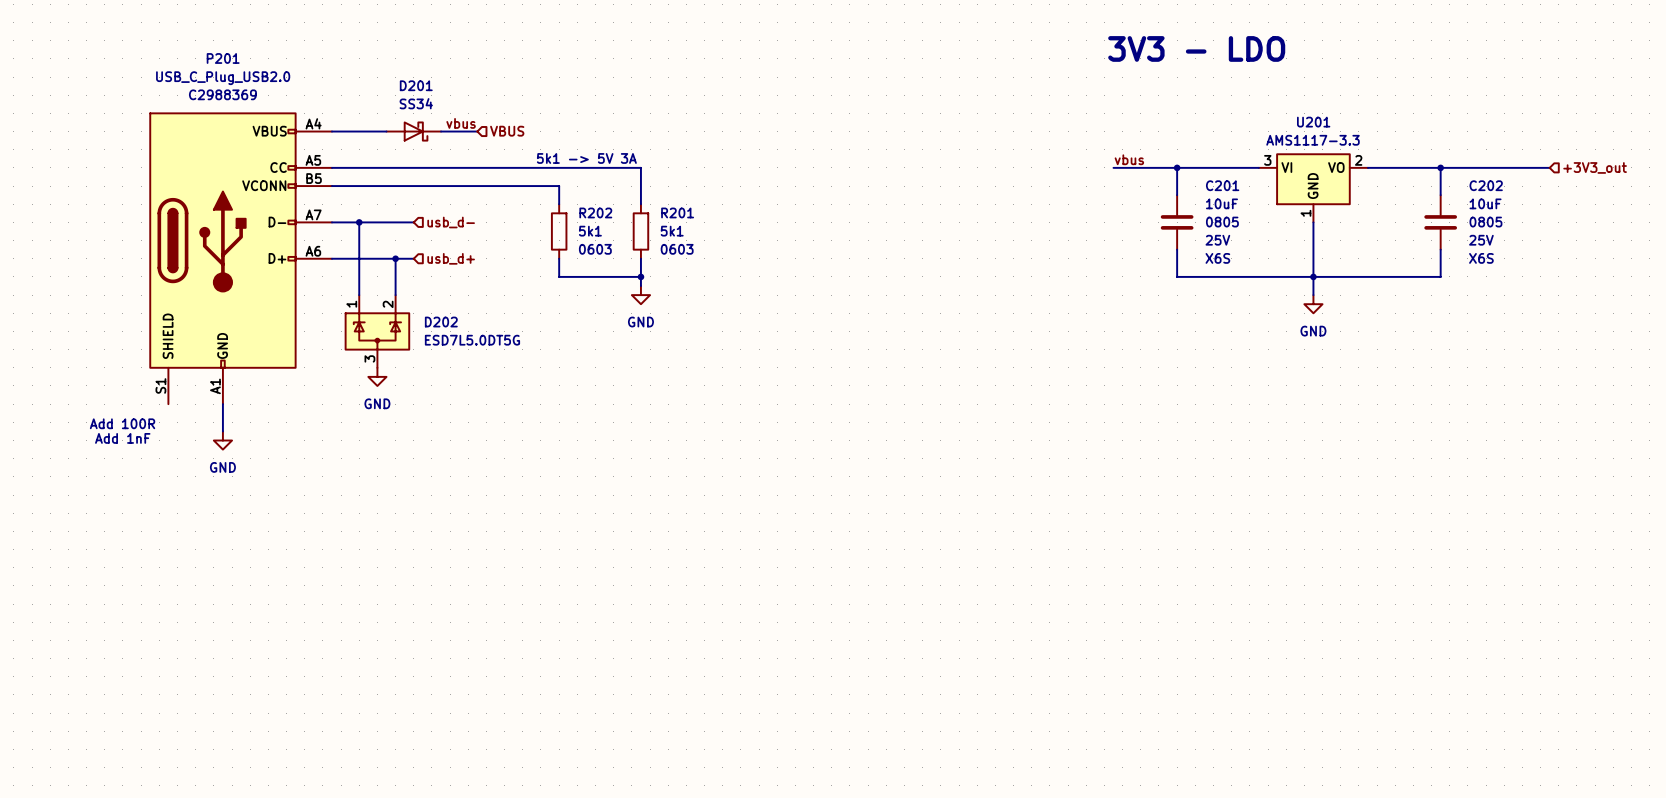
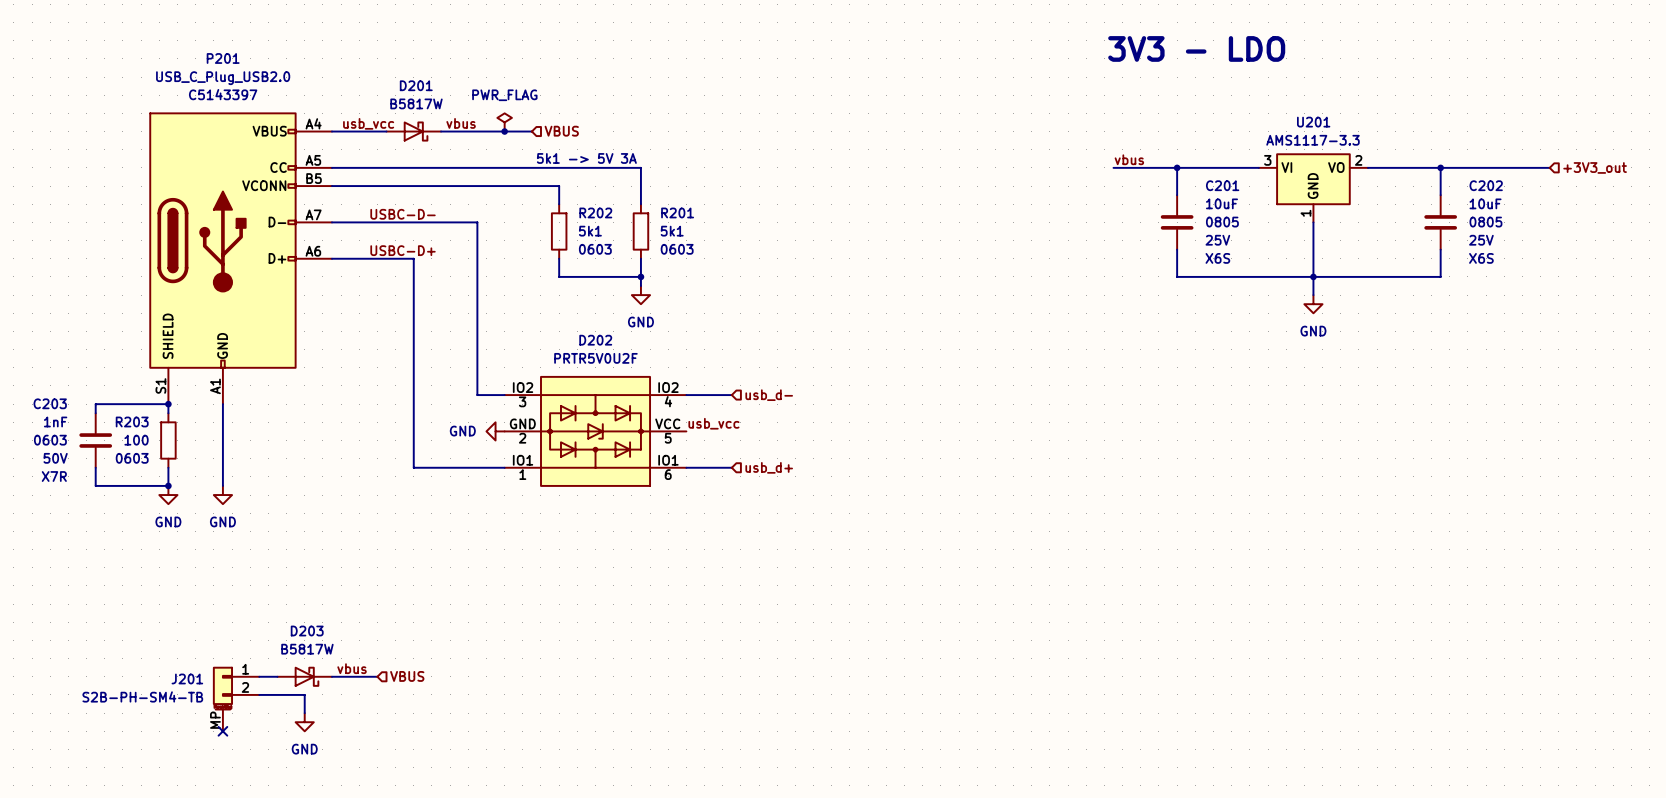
P201 text: C2988369 (222, 94) -> C5143397 (223, 94)
D201 value: SS34 (416, 103) -> B5817W (416, 103)
power symbol: none -> PWR_FLAG (504, 122)
label: none -> usb_vcc (368, 123)
wire: none -> (477, 131) (531, 131)
junction: none -> (504, 131)
hierarchical label position: VBUS (507, 131) -> VBUS (561, 131)
label: none -> USBC-D- (403, 214)
wire: (359, 222) (359, 295) -> none
junction: (359, 222) -> none
wire: none -> (413, 222) (477, 222) (477, 395) (504, 395)
hierarchical label: usb_d- (451, 222) -> none
label: none -> USBC-D+ (403, 250)
wire: (395, 258) (395, 295) -> none
junction: (395, 258) -> none
wire: none -> (413, 258) (413, 467) (504, 467)
hierarchical label: usb_d+ (451, 258) -> none
D202 symbol: [344, 295, 411, 368] -> [504, 375, 687, 487]
D202 name position: D202 (441, 322) -> D202 (595, 340)
D202 value: ESD7L5.0DT5G (472, 340) -> PRTR5V0U2F (595, 358)
power symbol: GND (377, 376) -> none
wire: none -> (686, 395) (731, 395)
hierarchical label: none -> usb_d- (769, 395)
junction: none -> (168, 404)
wire: none -> (95, 413) (95, 404) (168, 404) (168, 413)
text: Add 100R (122, 423) -> none
label: none -> usb_vcc (713, 423)
wire: none -> (222, 431) (222, 485)
power symbol: none -> GND (495, 431)
text: Add 1nF (122, 438) -> none
C203: none -> 1nF (95, 440)
R203: none -> 100 (168, 440)
power symbol: GND (222, 440) -> none
wire: none -> (95, 467) (95, 485) (168, 485) (168, 467)
wire: none -> (686, 467) (731, 467)
hierarchical label: none -> usb_d+ (769, 467)
junction: none -> (168, 485)
power symbol: none -> GND (168, 495)
power symbol: none -> GND (222, 495)
label: none -> vbus (352, 668)
wire: none -> (259, 676) (277, 676)
D203: none -> B5817W (304, 676)
wire: none -> (331, 676) (377, 676)
hierarchical label: none -> VBUS (407, 676)
wire: none -> (259, 694) (304, 694) (304, 713)
J201: none -> S2B-PH-SM4-TB (236, 699)
power symbol: none -> GND (304, 722)
no-connect mark: none -> (222, 731)

